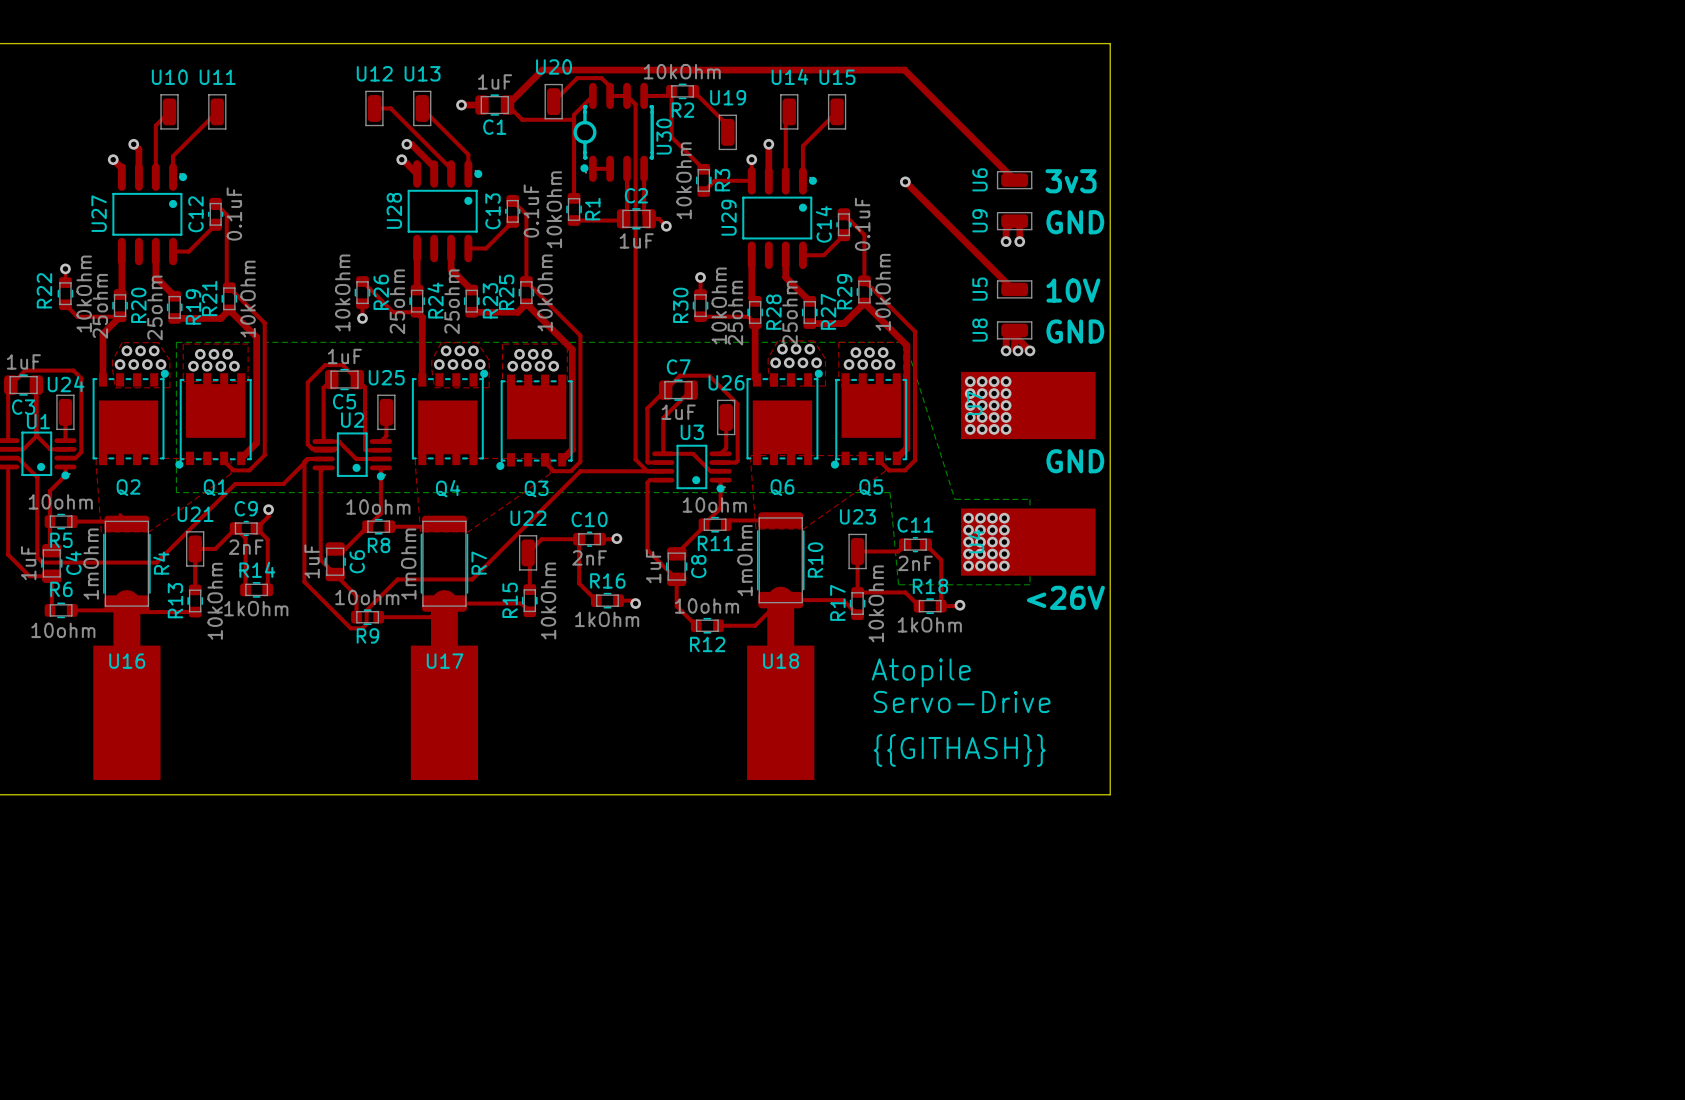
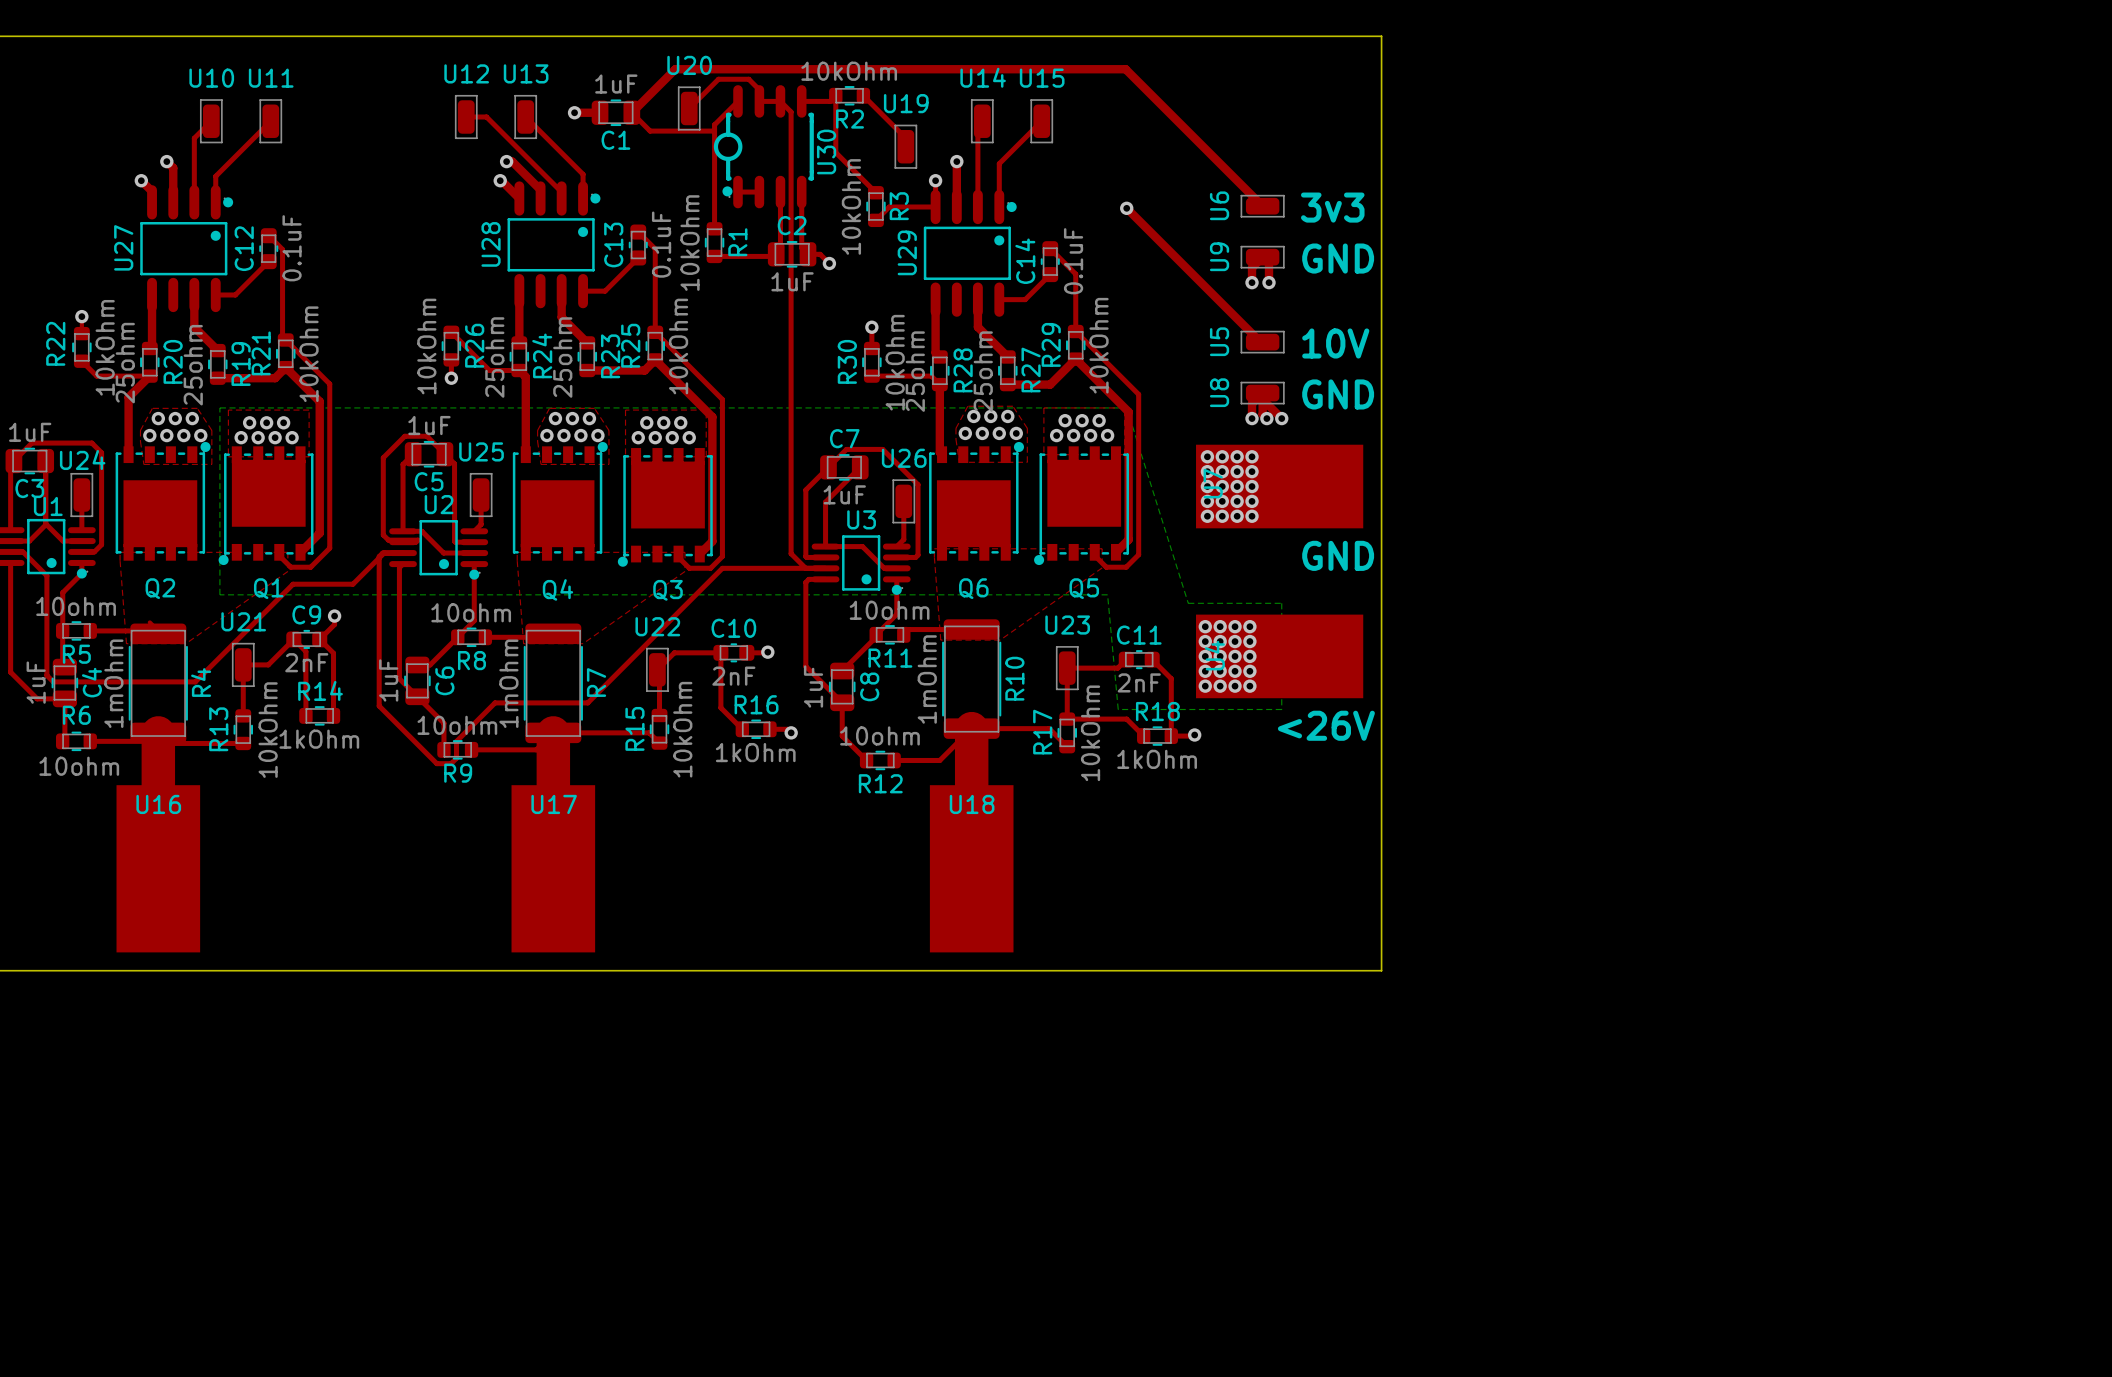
text: Atopile (921, 672) -> none
text: Servo-Drive (962, 701) -> none
text: {{GITHASH}} (959, 750) -> none

